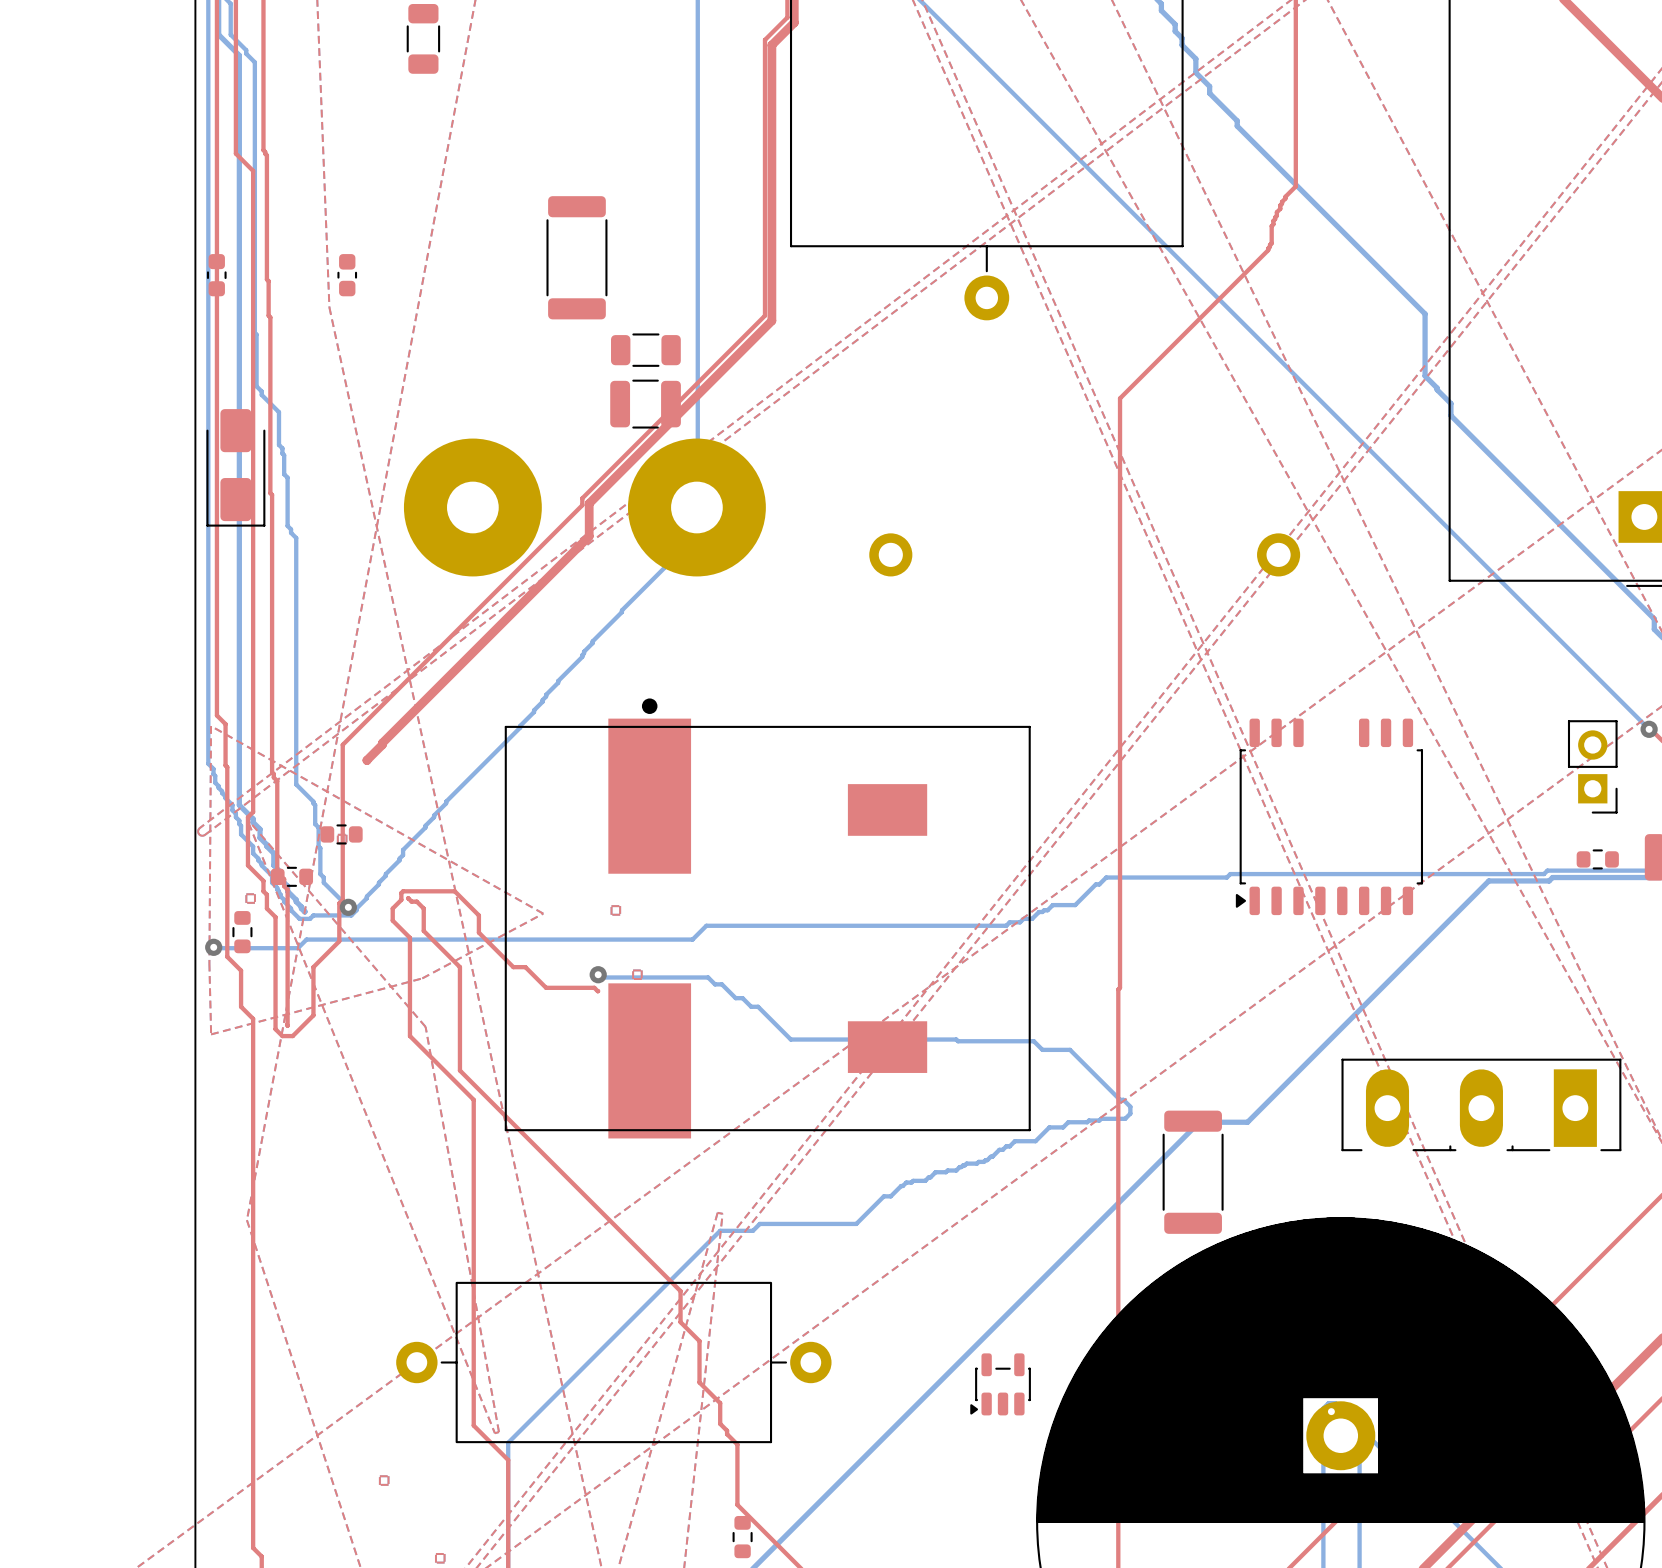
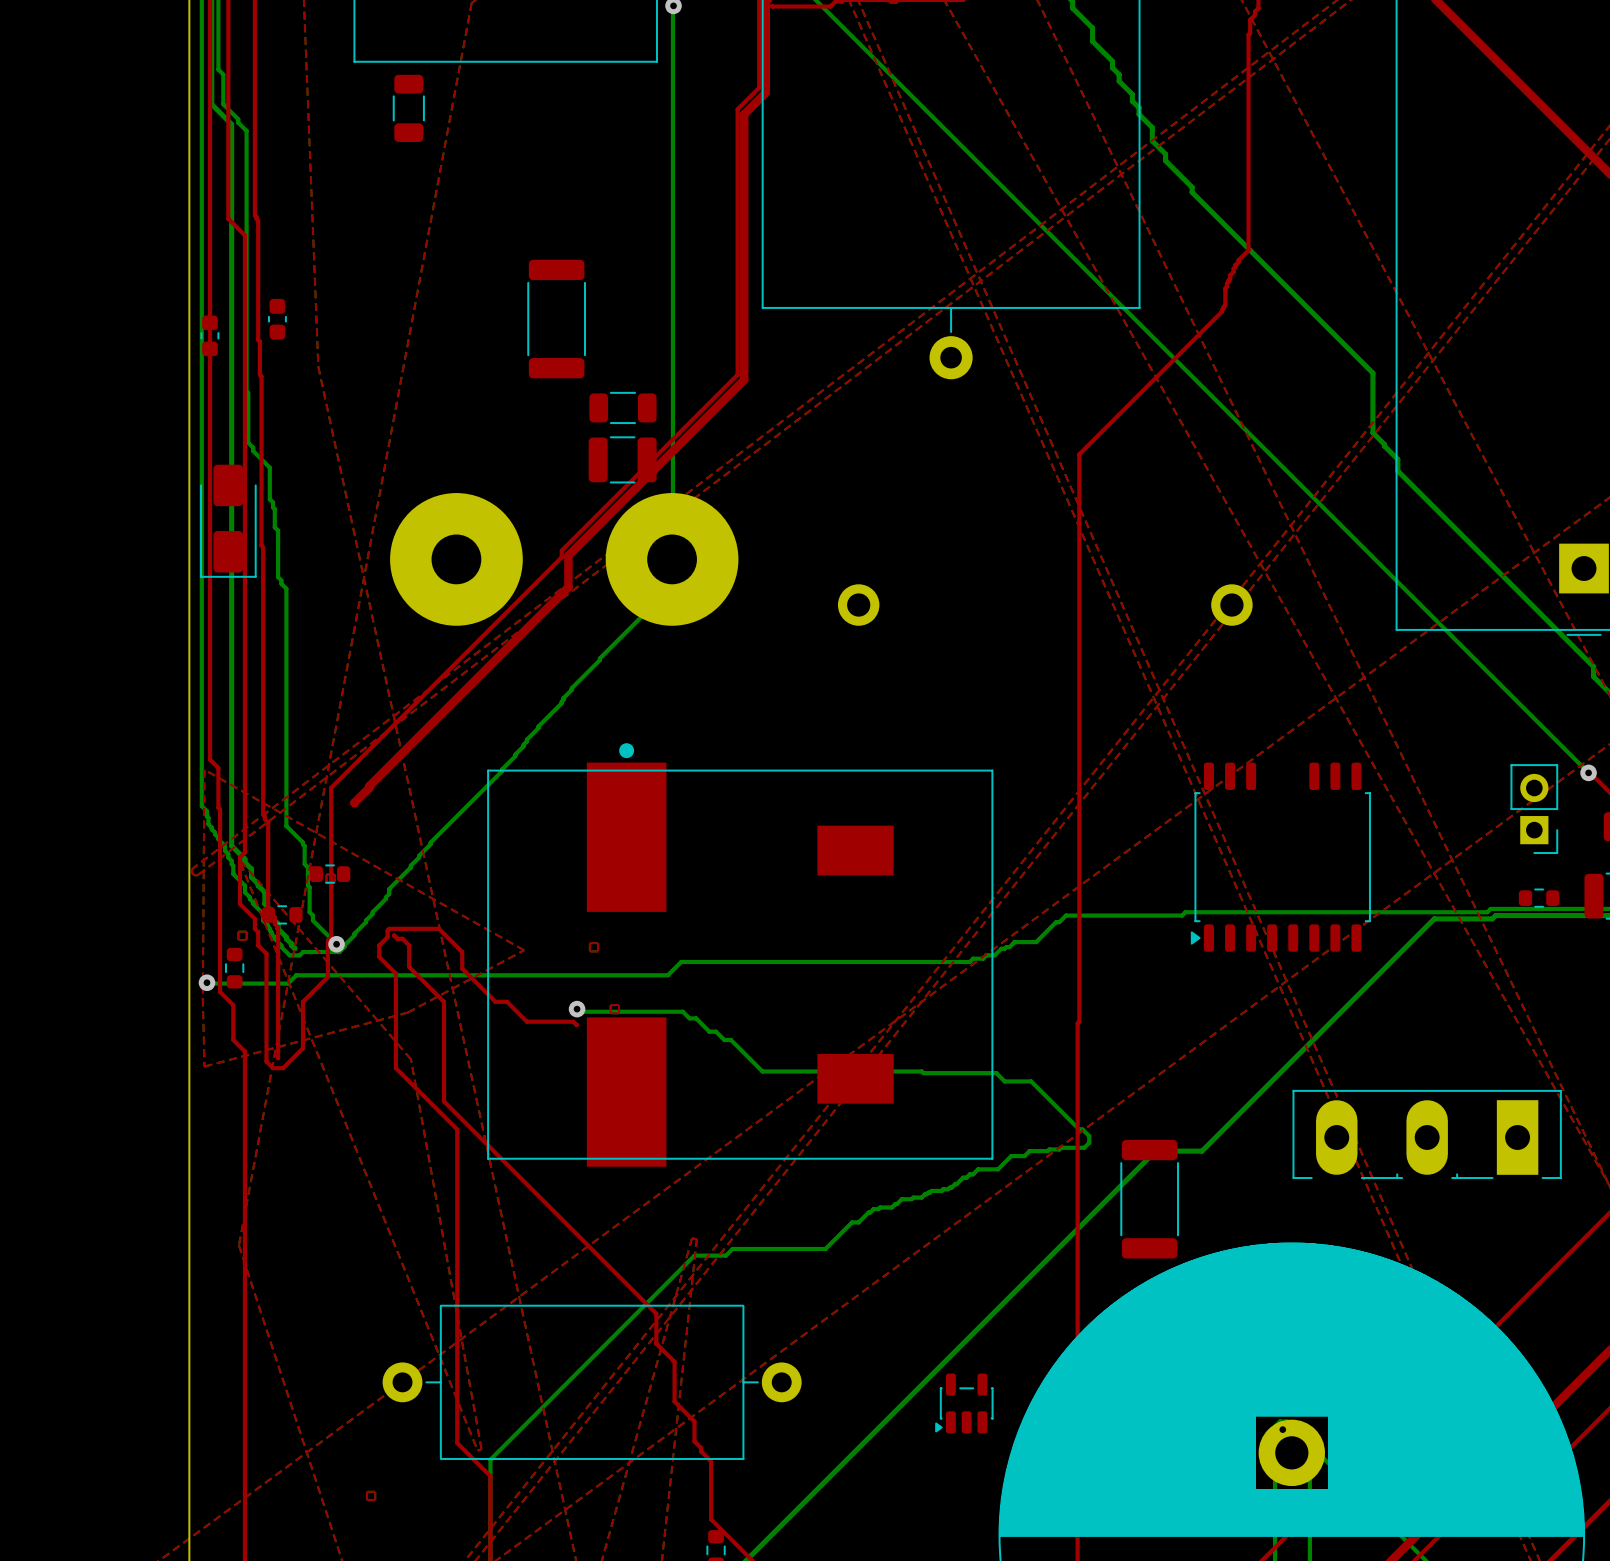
part position: (347, 275) -> (277, 319)

